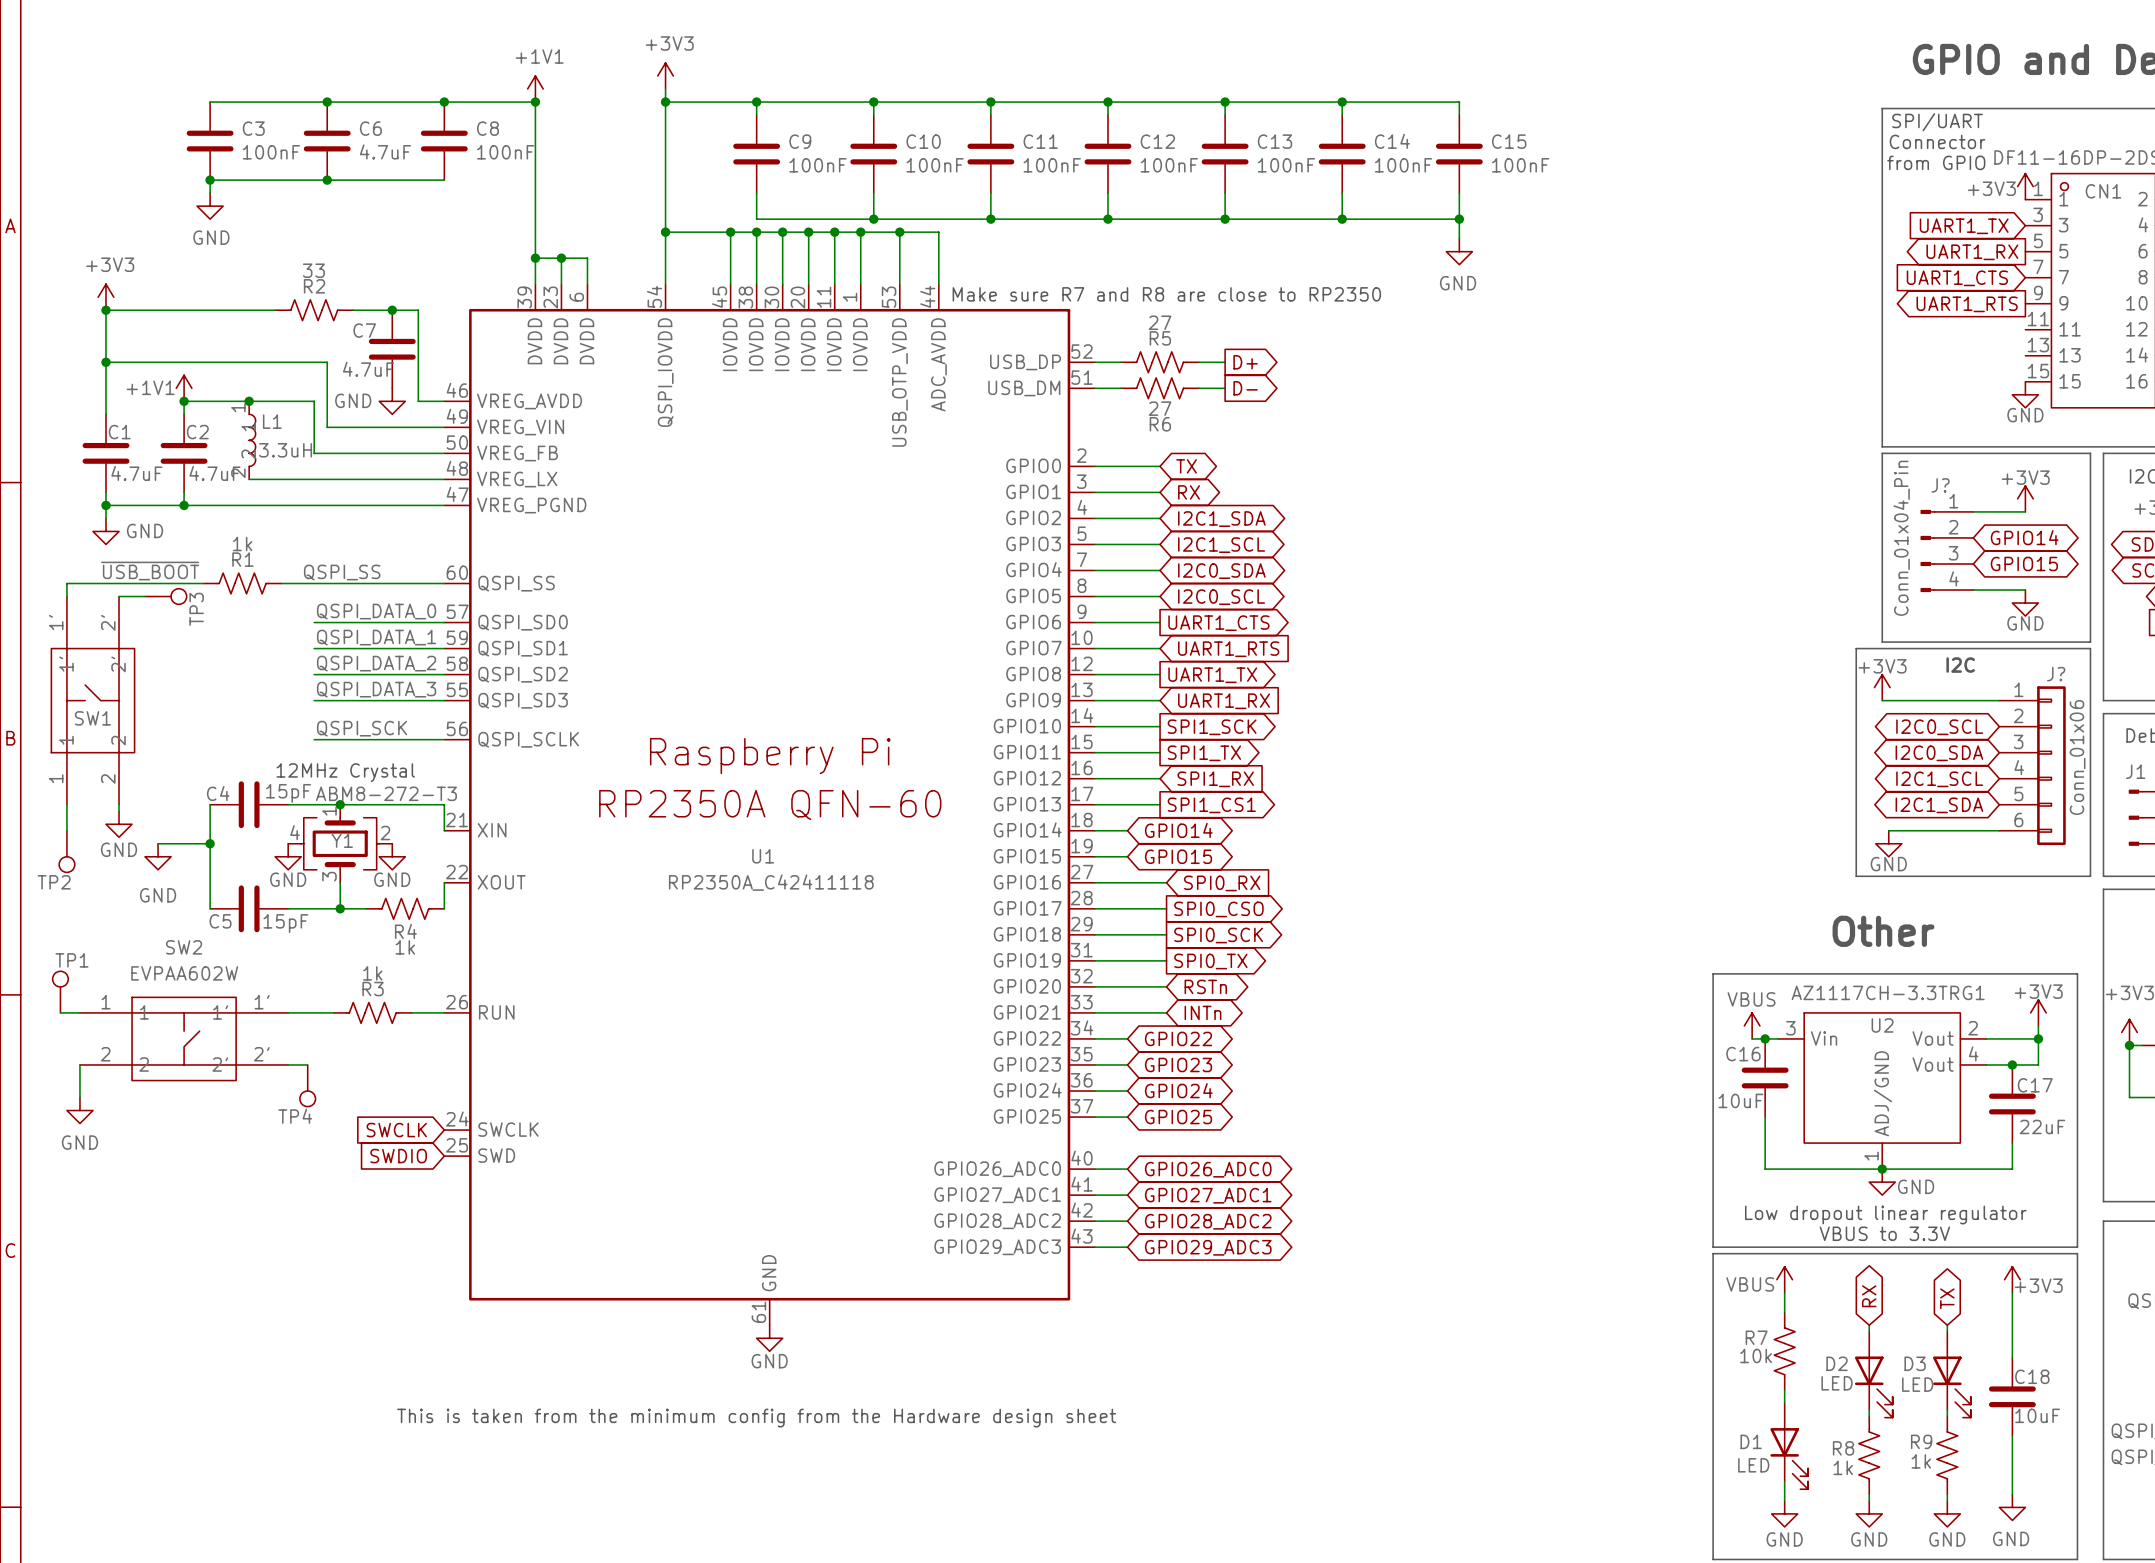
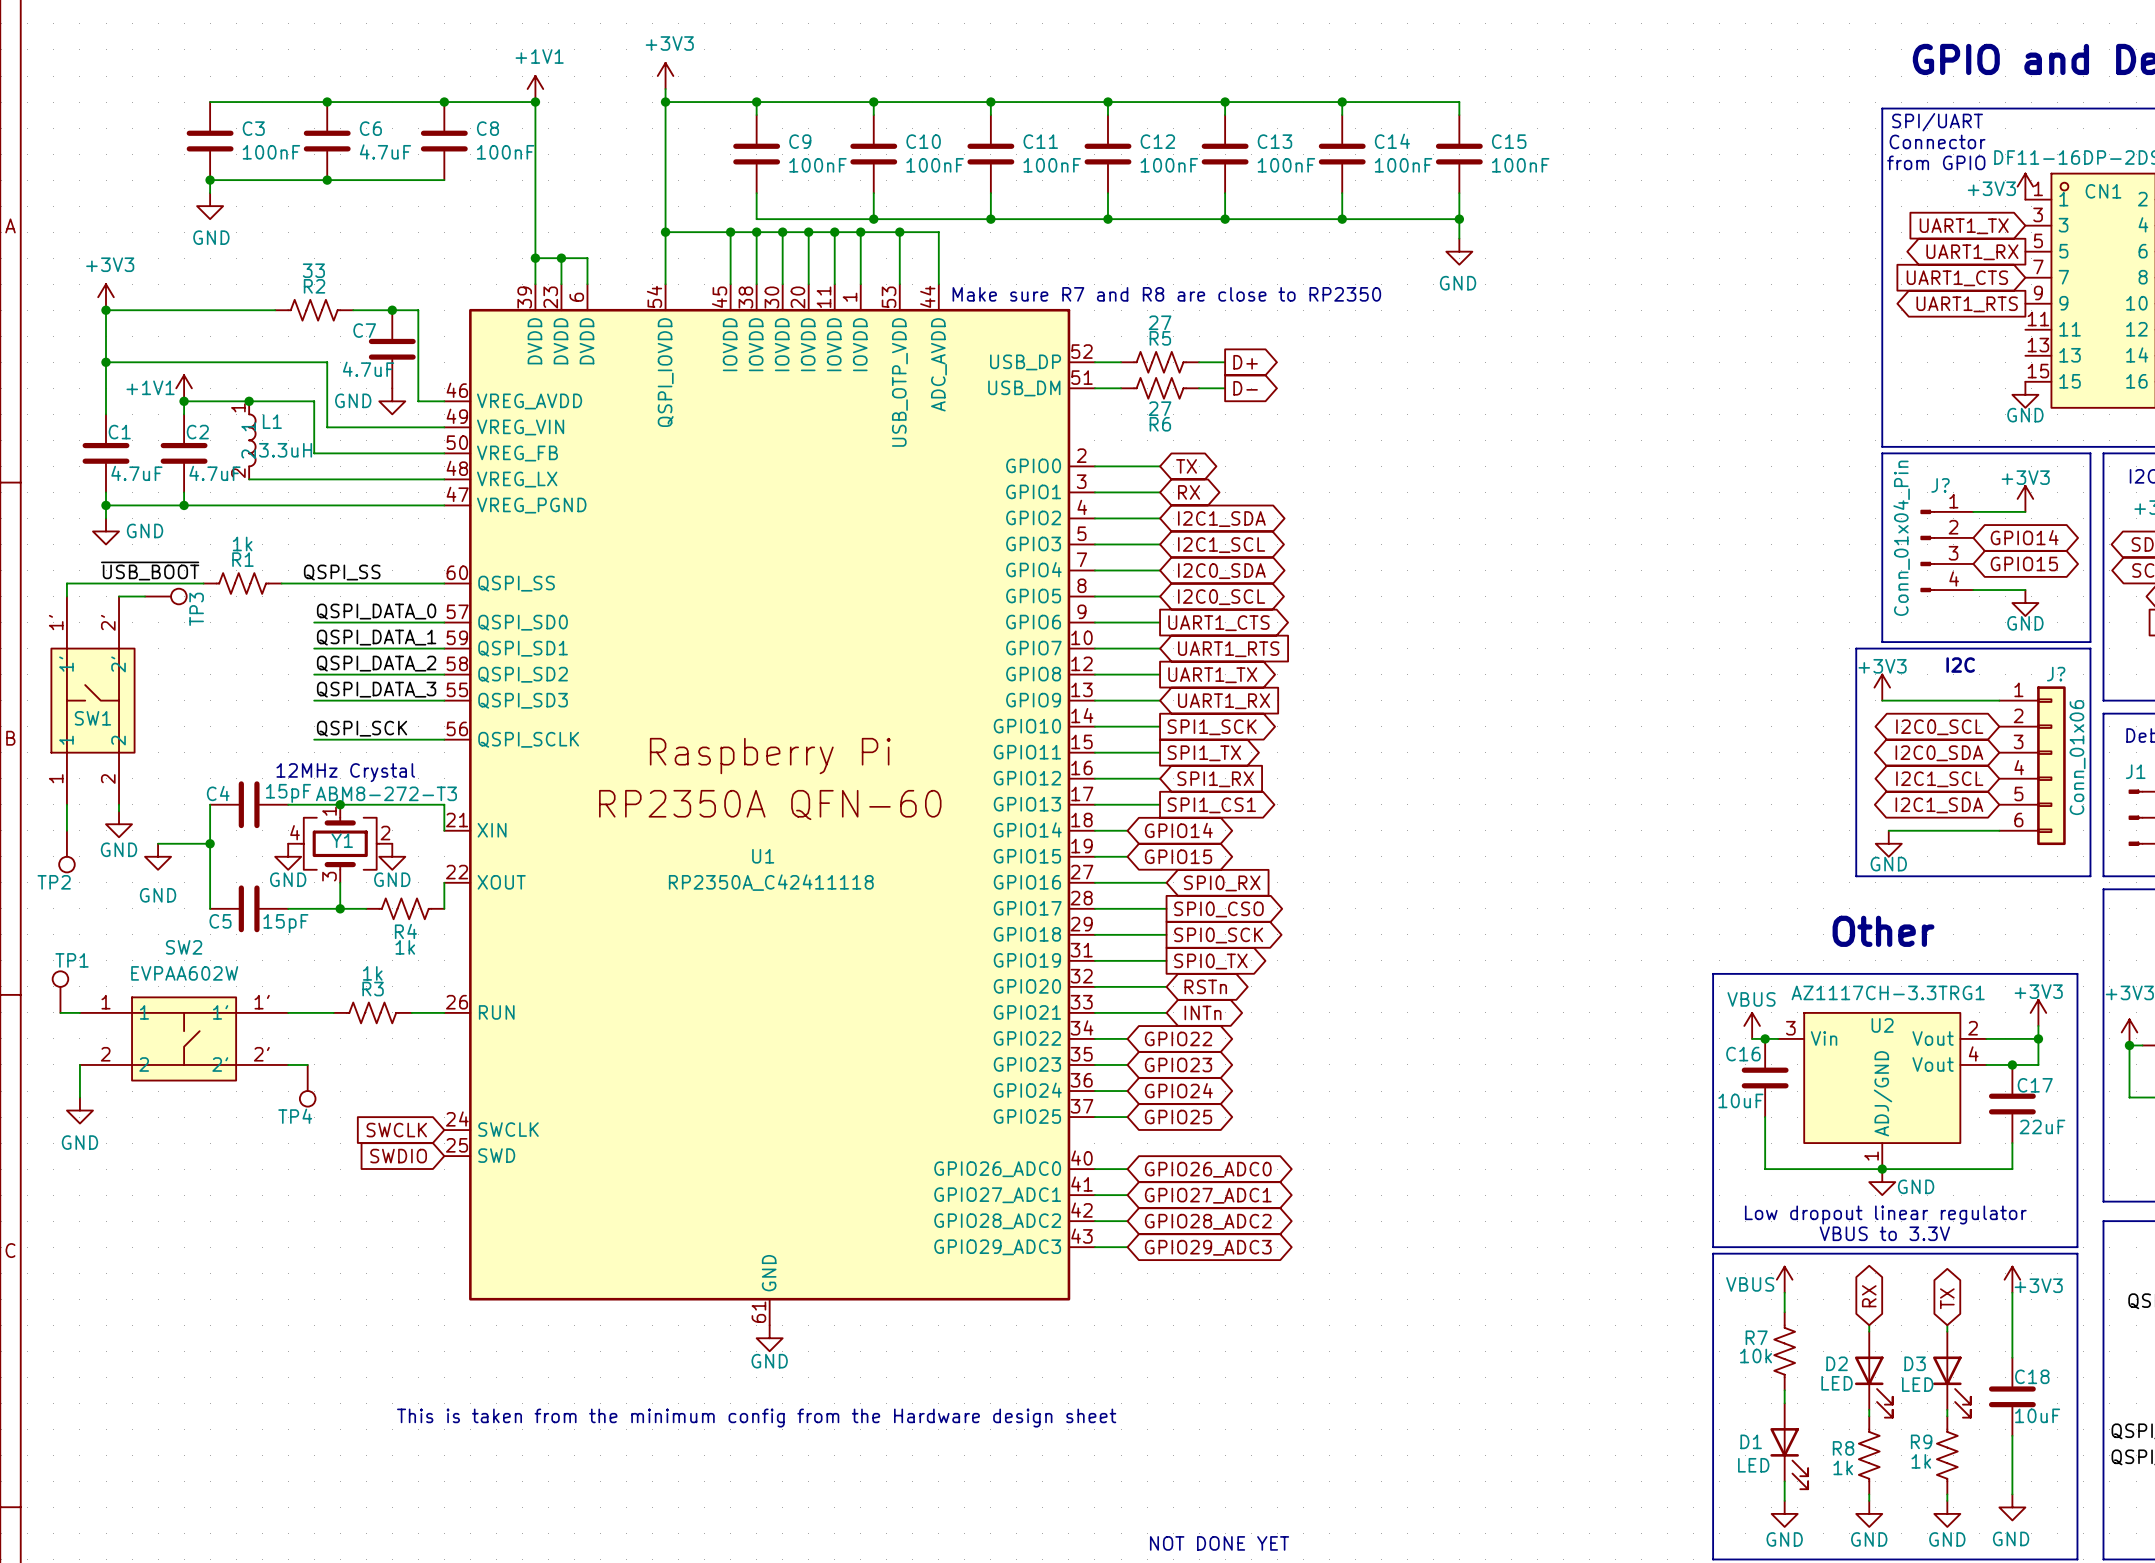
text: none -> NOT DONE YET (1219, 1543)

